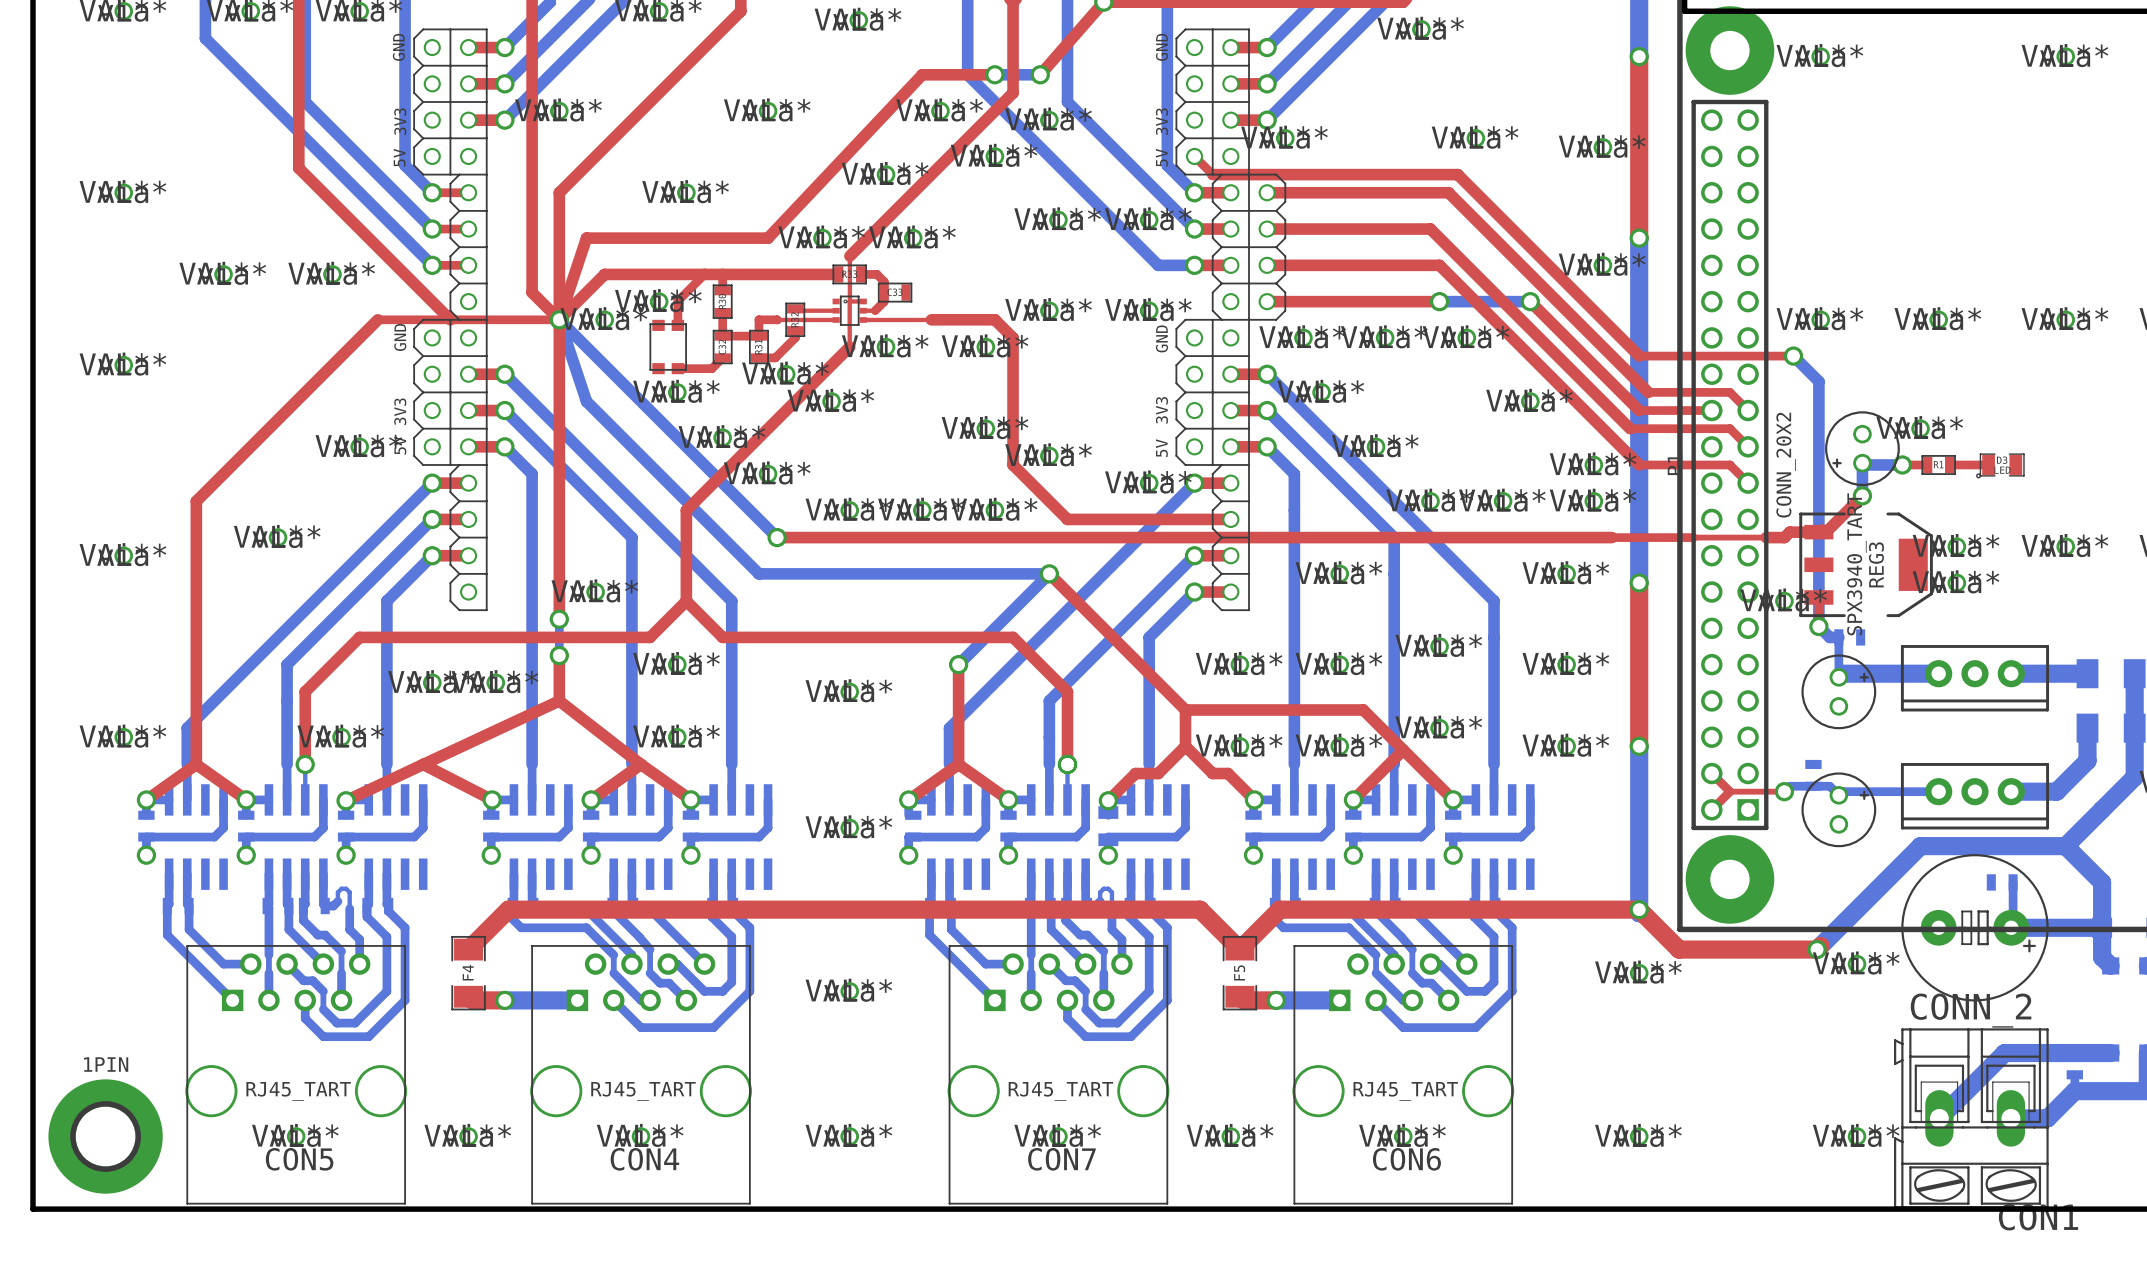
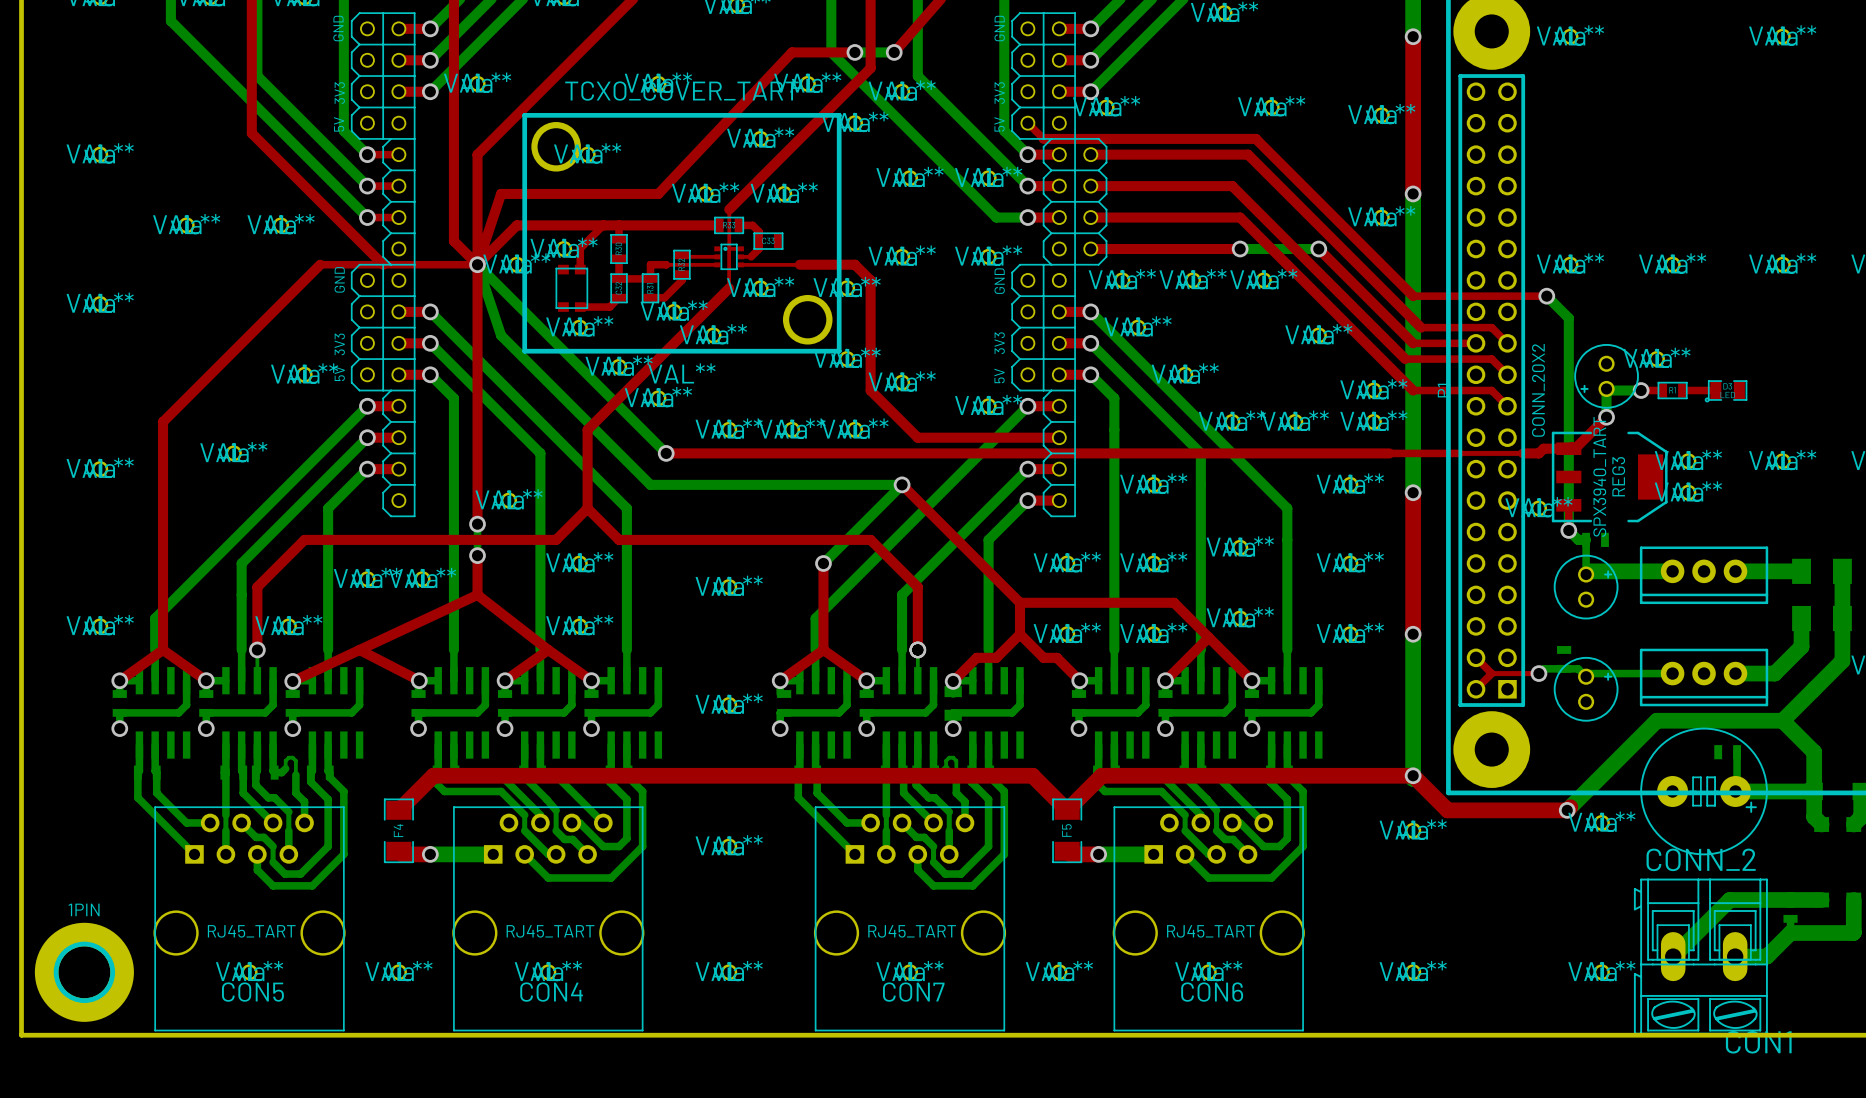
TCXO_COVER_TART: none -> VAL** (681, 233)

